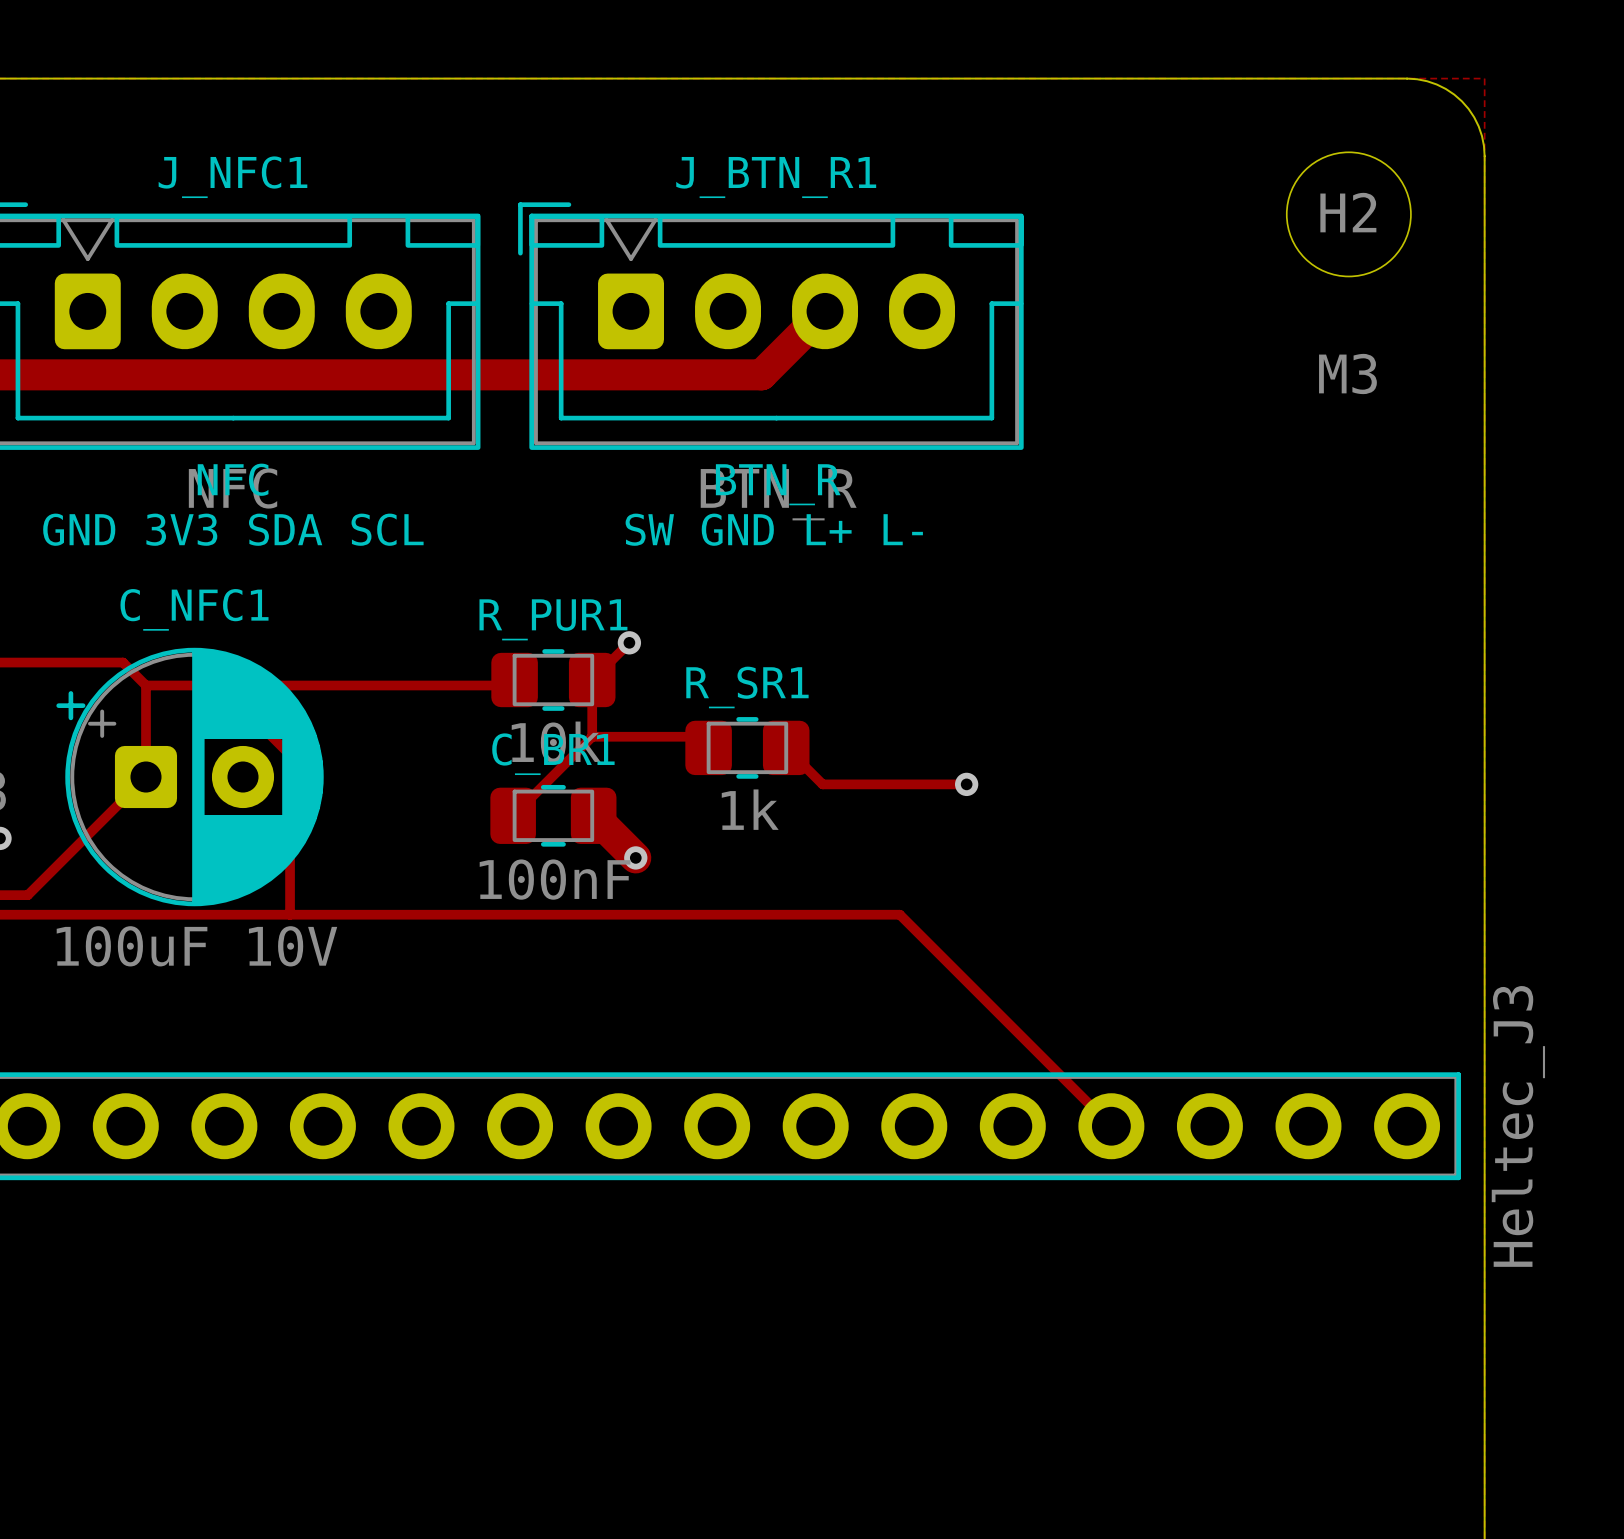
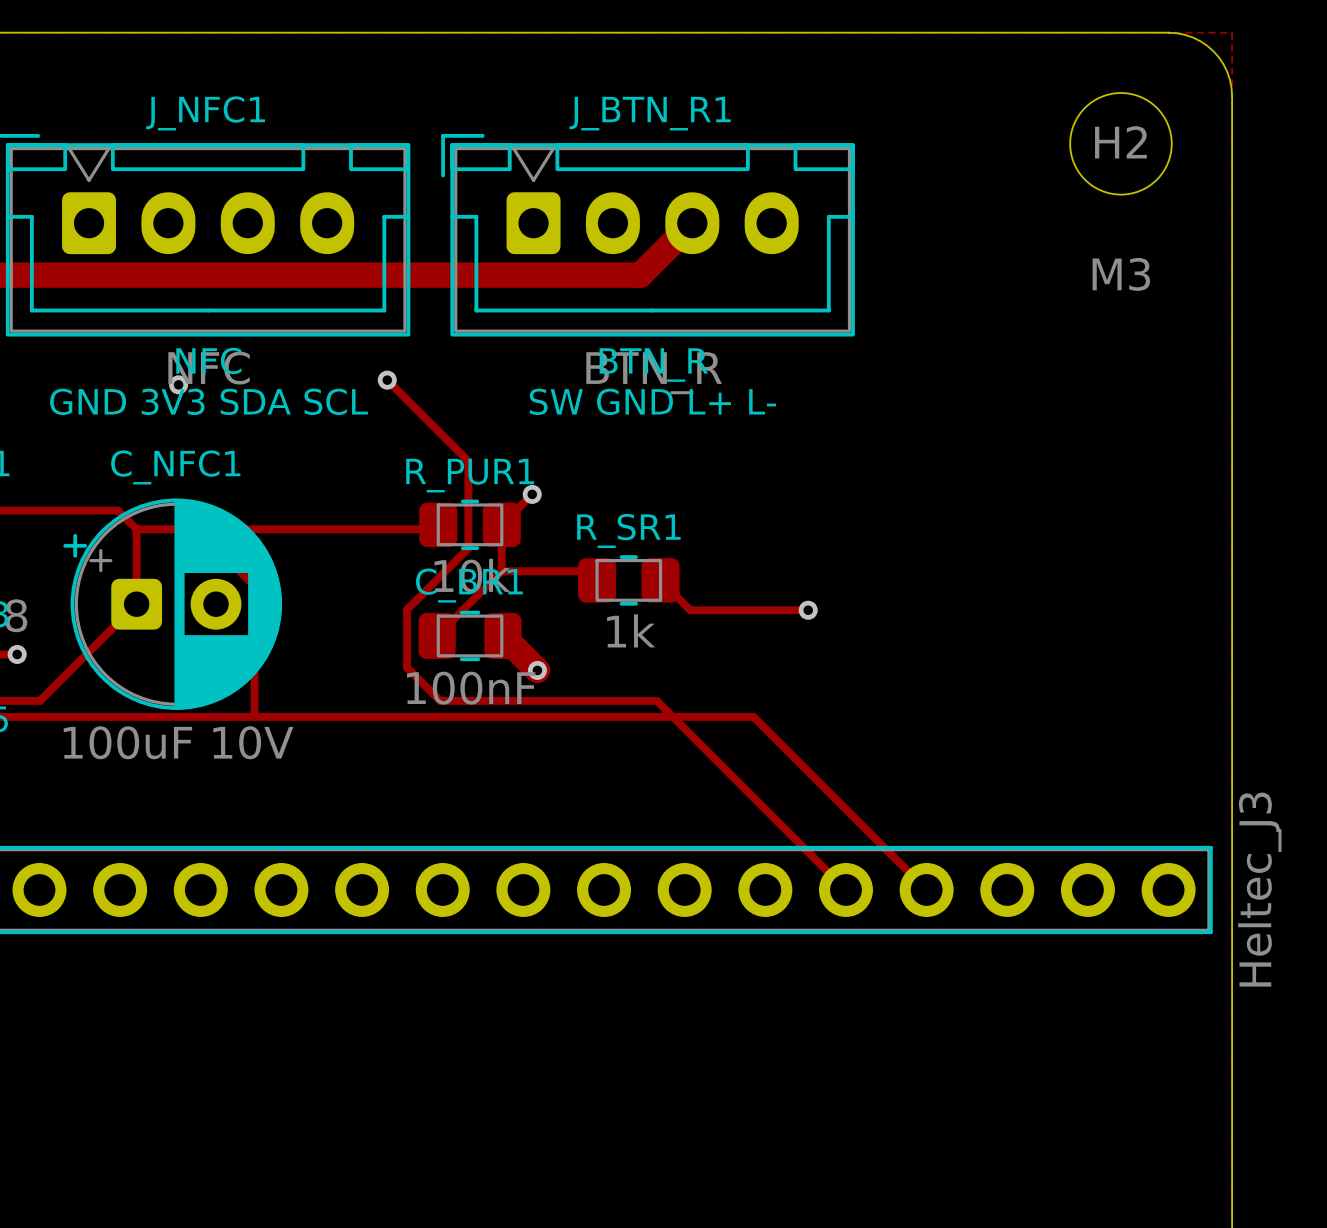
track: none -> (387, 380) (468, 461) (468, 548) (407, 609) (407, 667) (440, 700) (656, 700) (845, 889)
via: none -> (387, 380)
via: none -> (178, 384)

